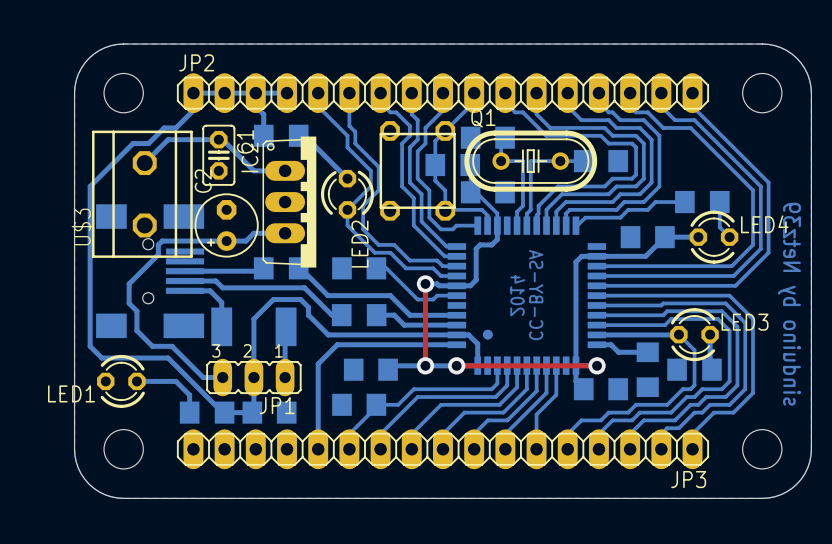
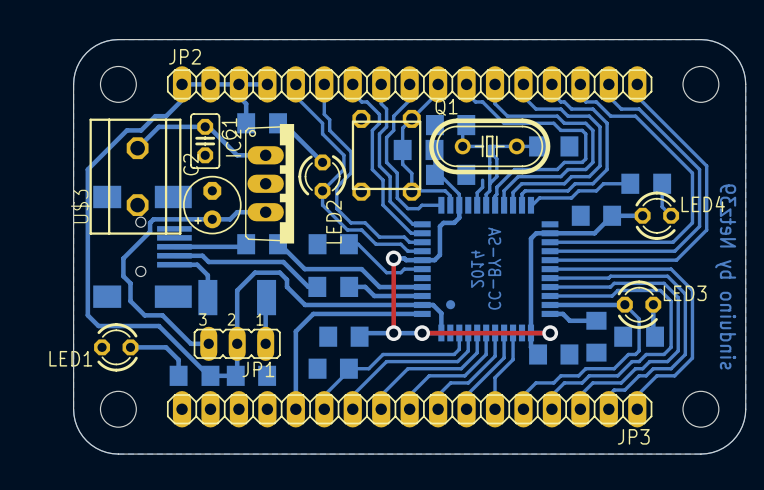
bottom track: (522, 161) (522, 198) -> none
bottom track: none -> (493, 146) (493, 155) (496, 158) (496, 176) (489, 183)

